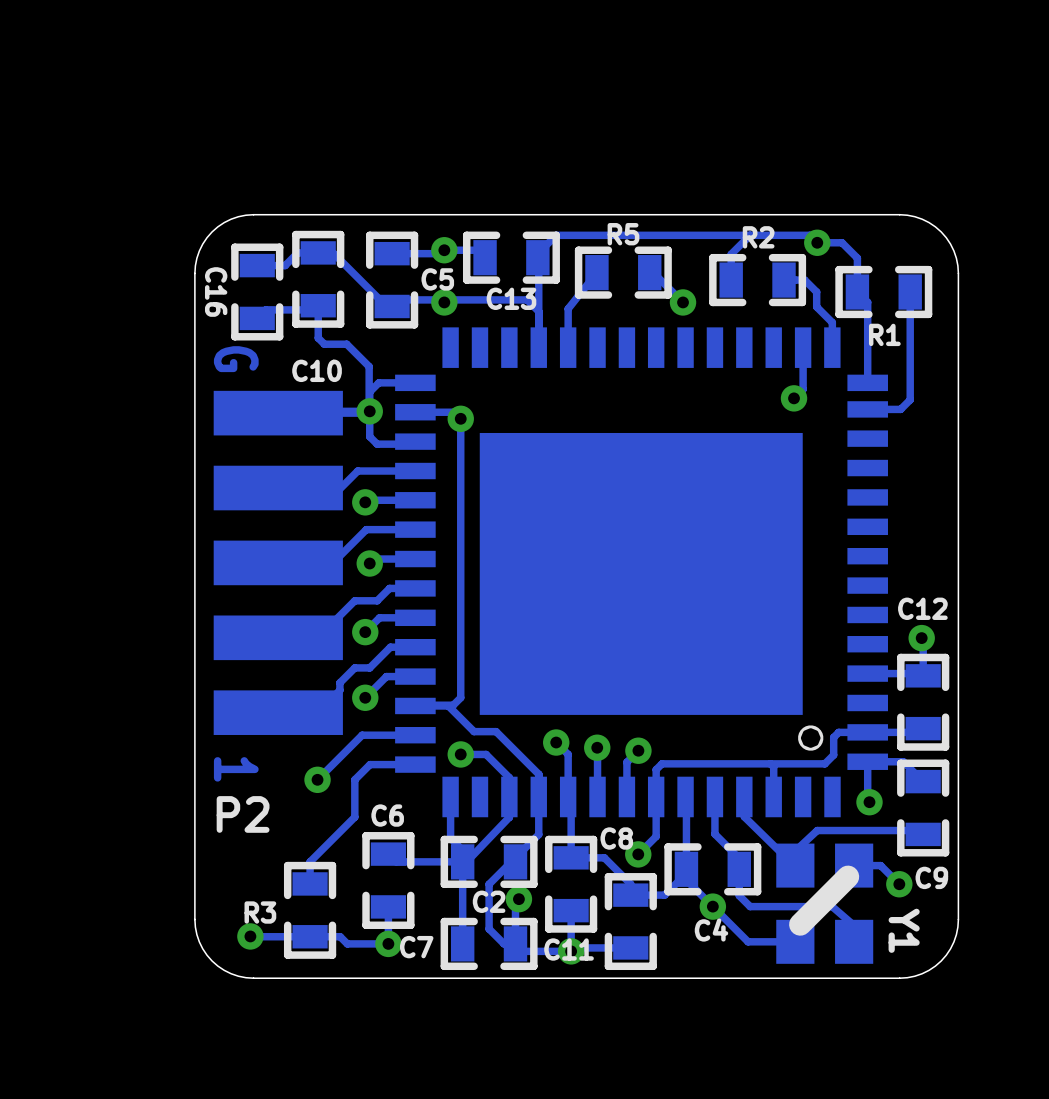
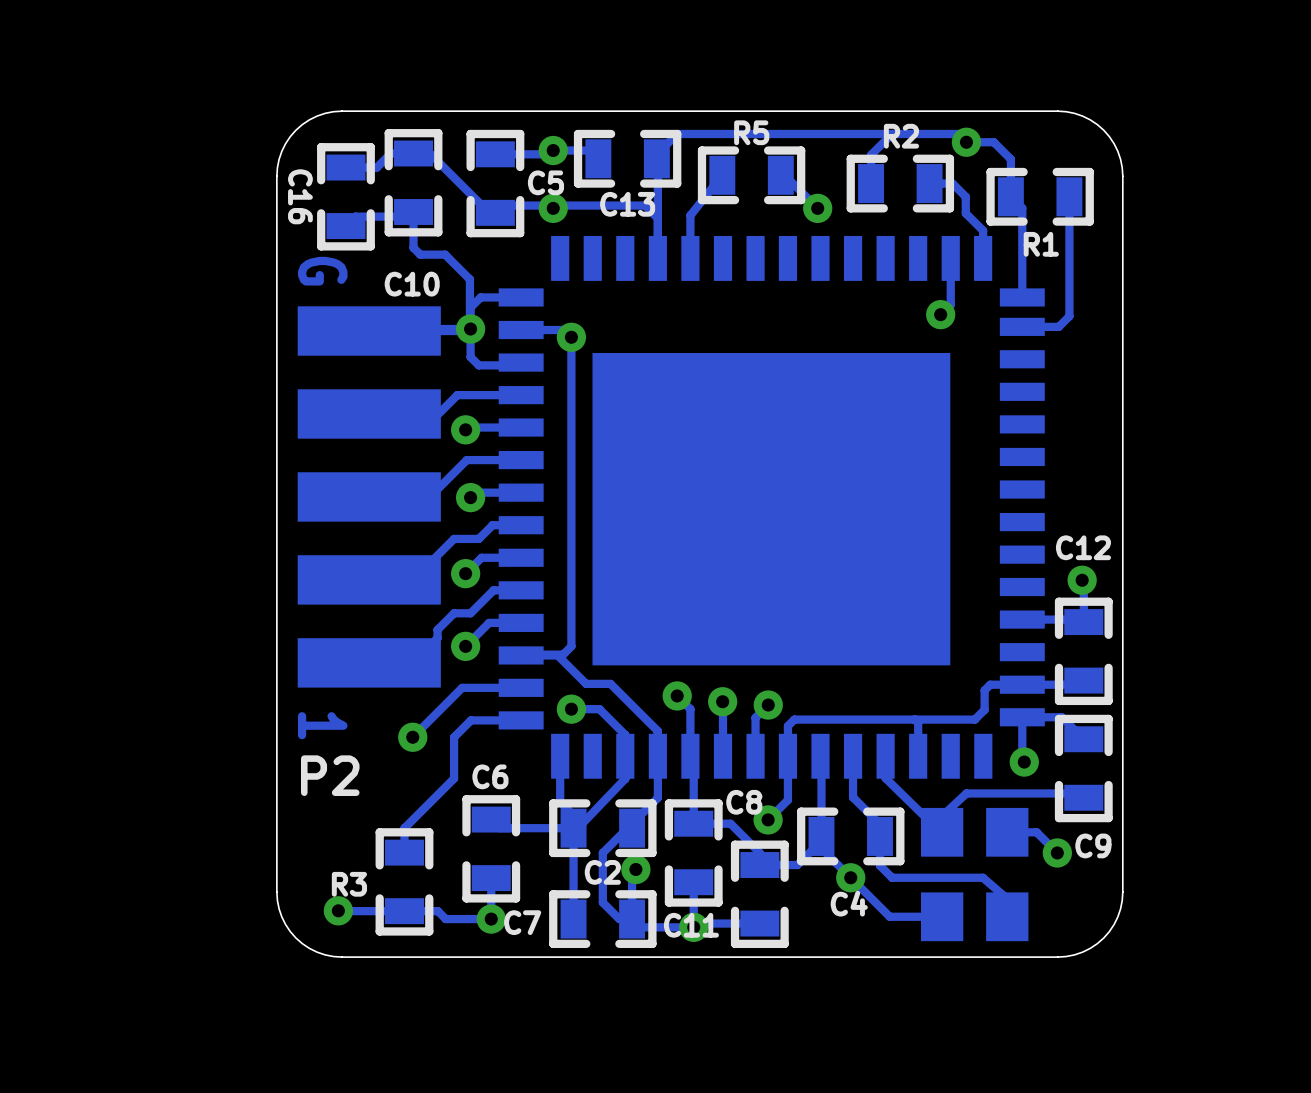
drawing: [798, 725, 824, 751] -> none
line: (848, 876) (800, 924) -> none
Y1 name: Y1 (904, 930) -> none

